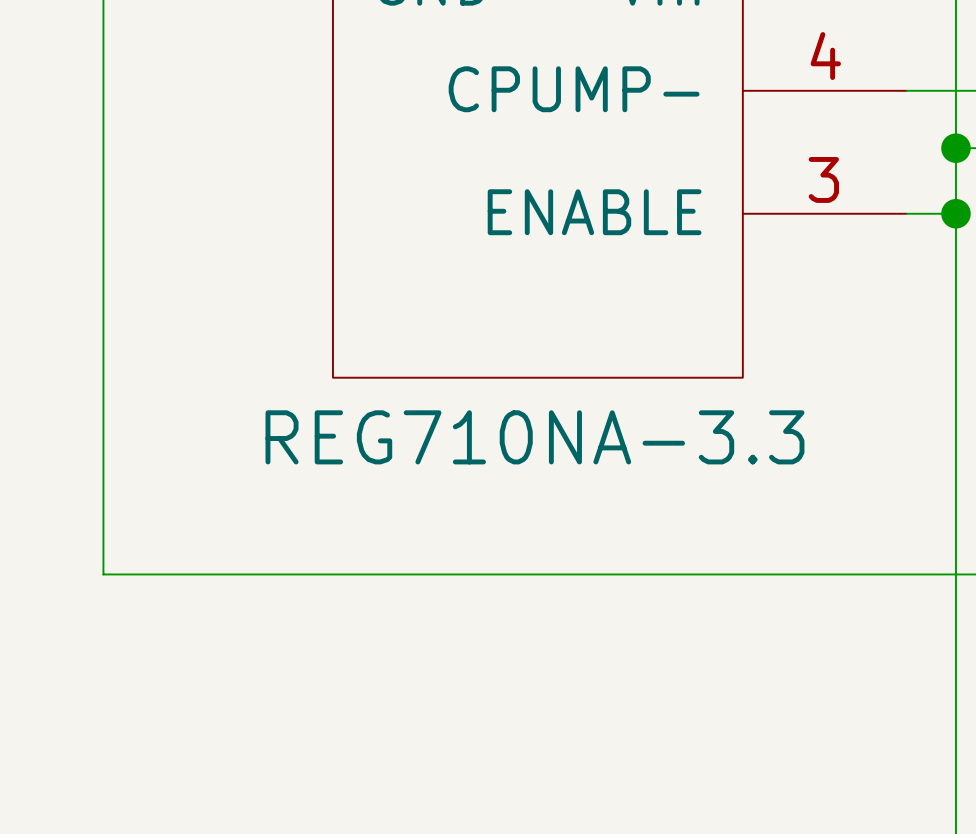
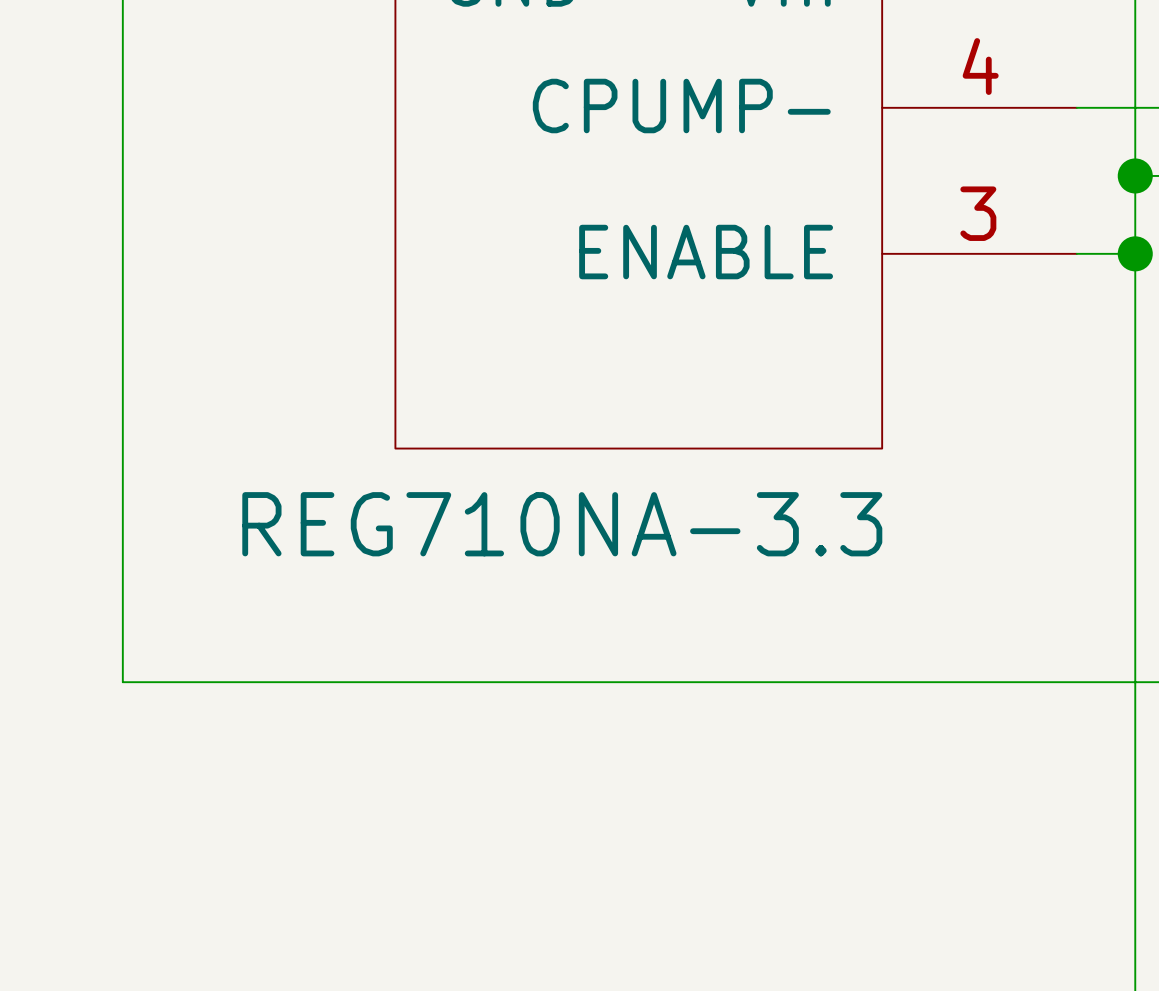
part value position: REG710NA-3.3 (534, 437) -> REG710NA-3.3 (562, 524)

